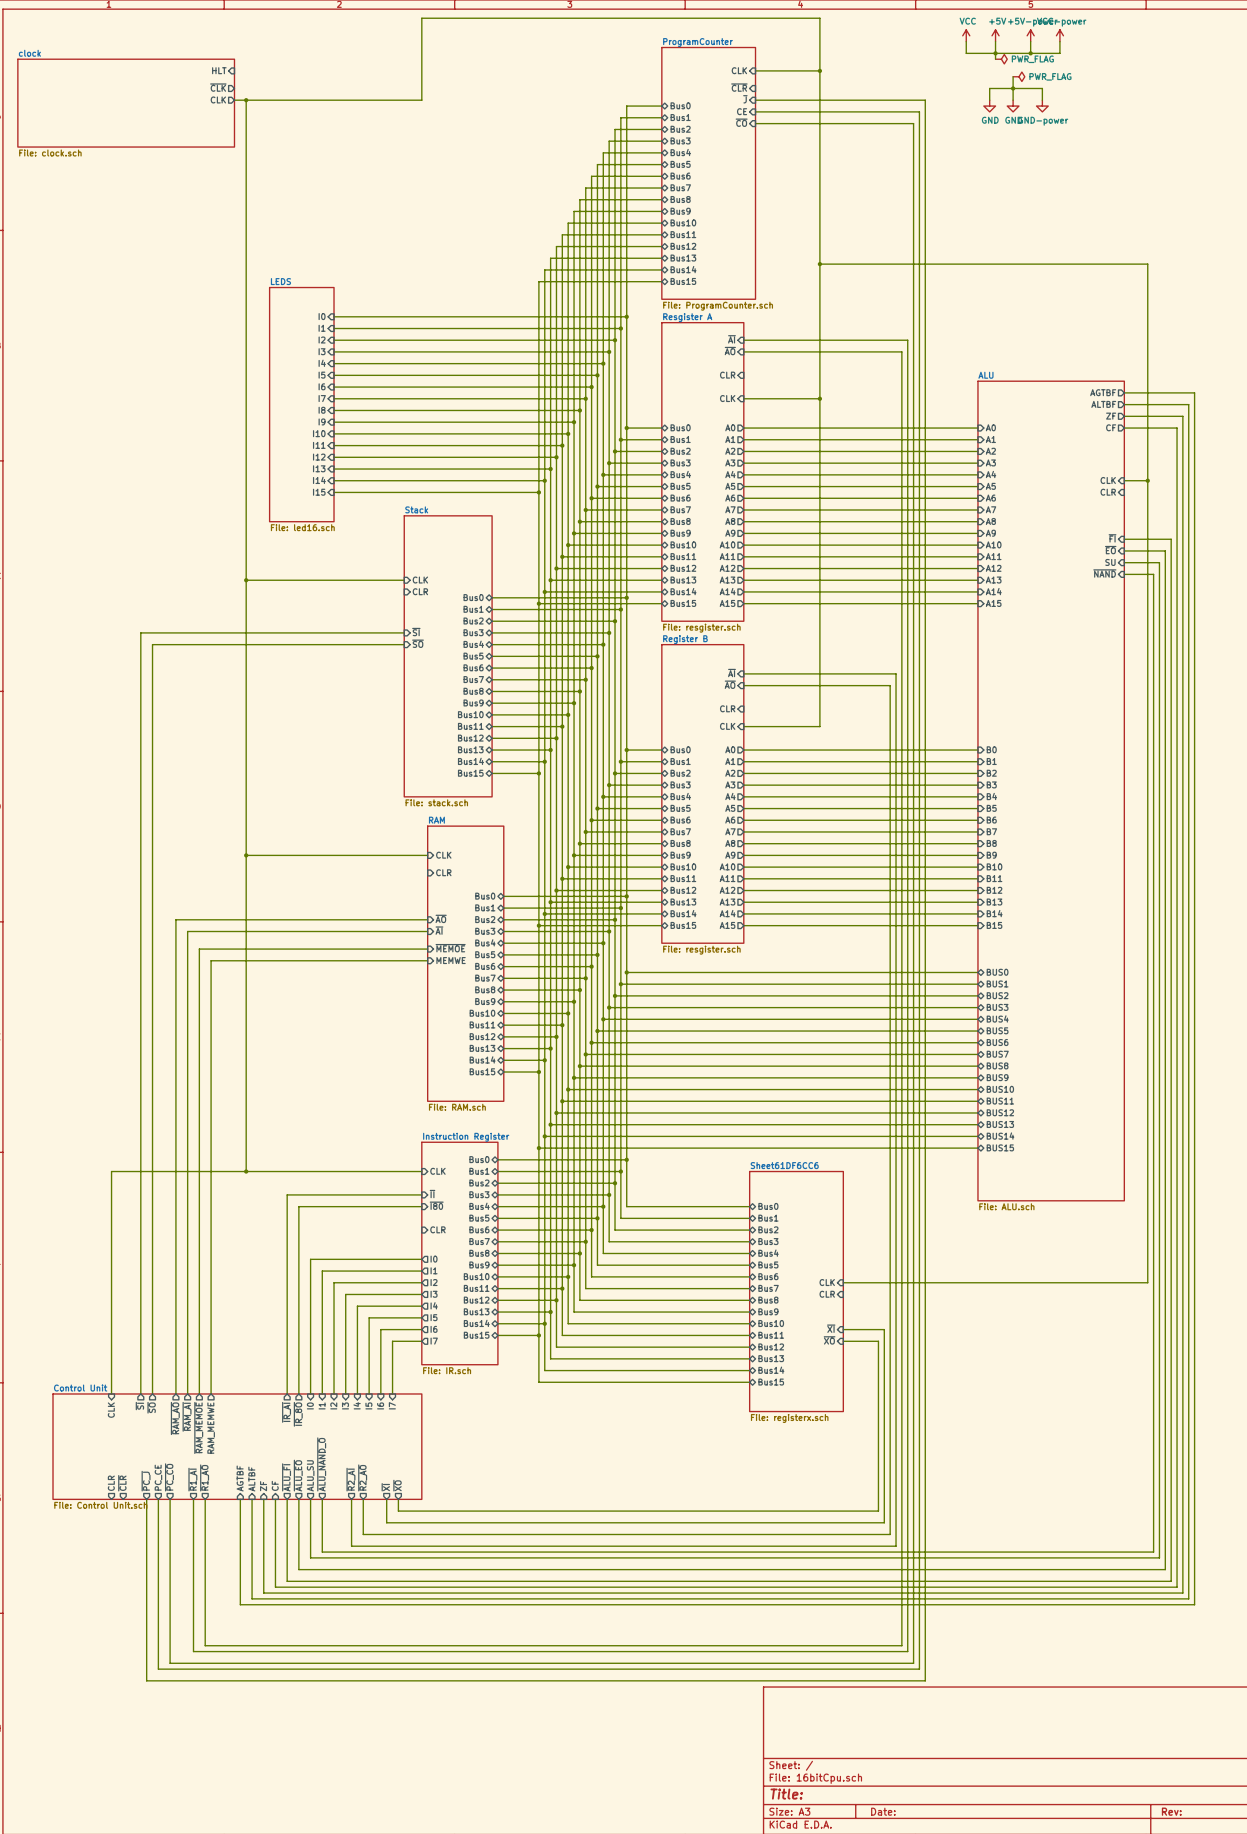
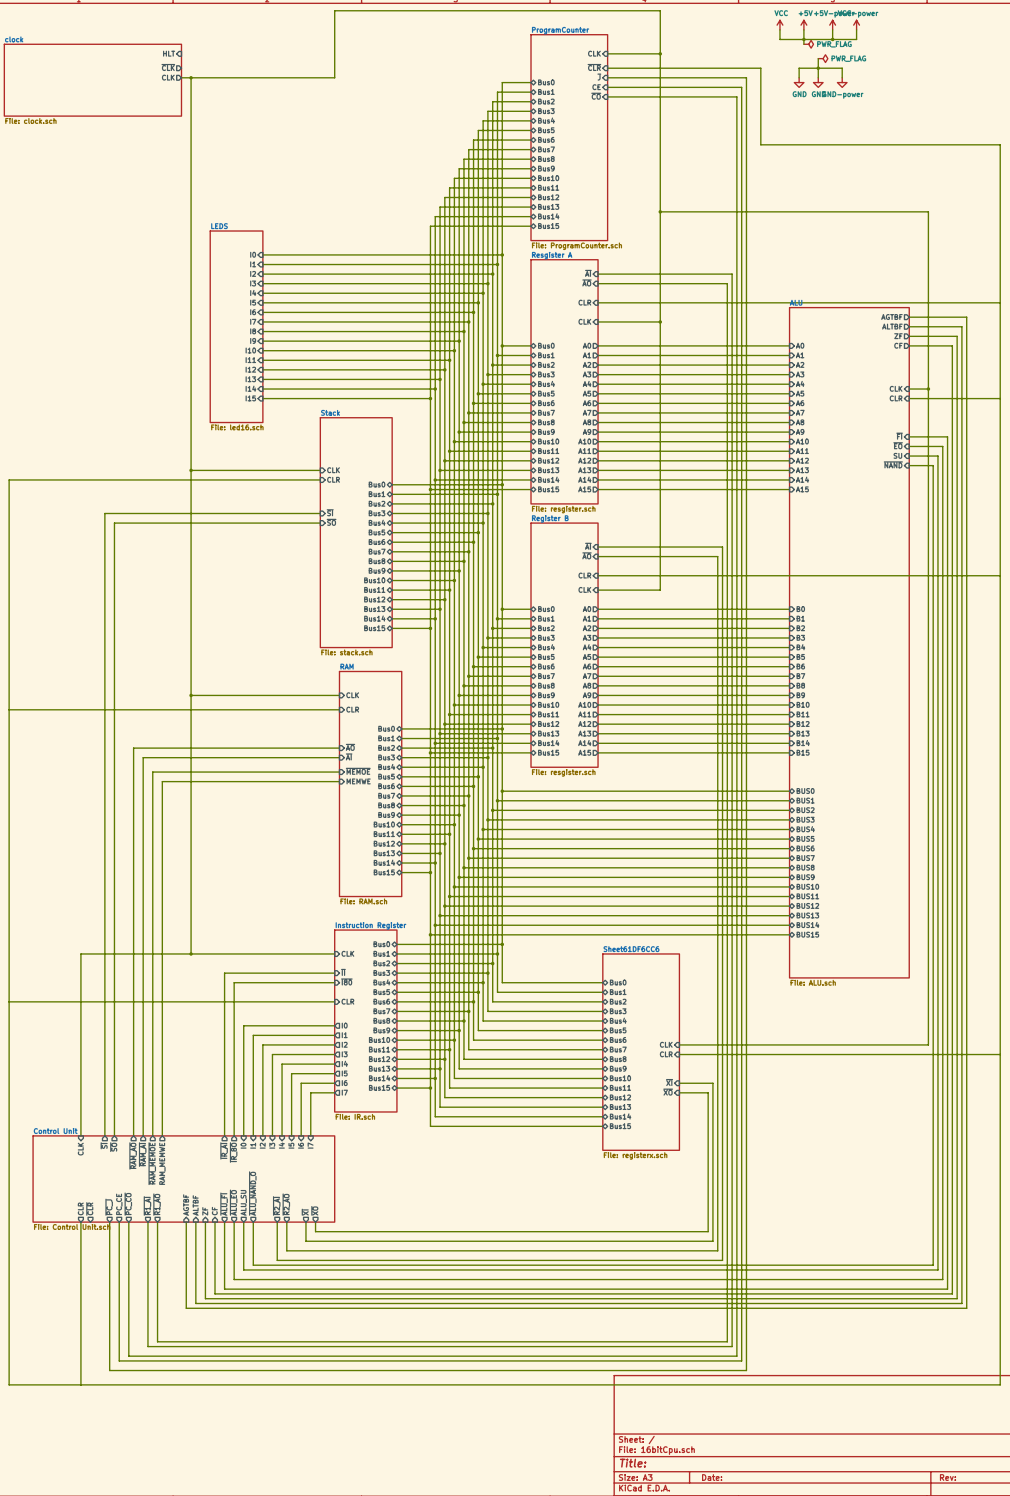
wire: none -> (607, 68) (760, 68) (760, 144) (1000, 144) (1000, 1384) (9, 1384) (9, 479) (320, 479)
wire: none -> (598, 302) (1000, 302)
wire: none -> (909, 398) (1000, 398)
wire: none -> (598, 575) (1000, 575)
wire: none -> (9, 709) (339, 709)
wire: none -> (9, 1001) (334, 1001)
wire: none -> (679, 1054) (1000, 1054)
wire: none -> (80, 1222) (80, 1384)

